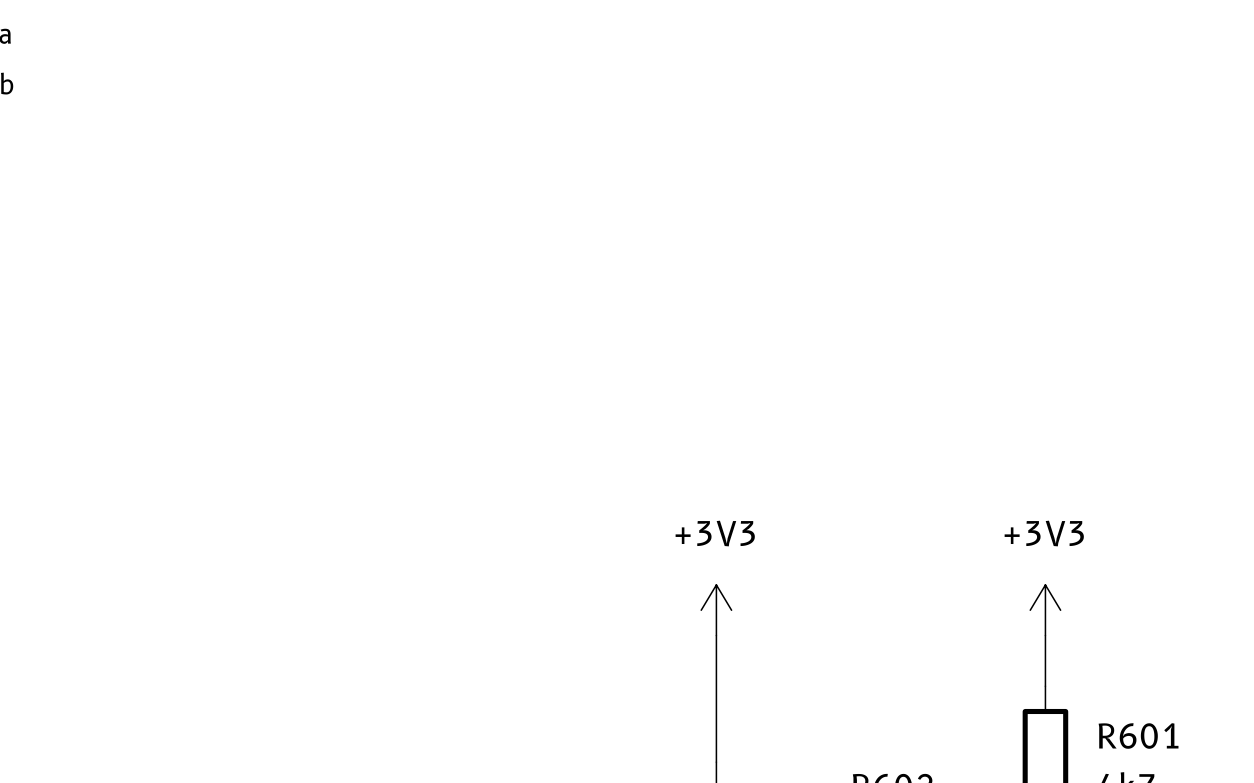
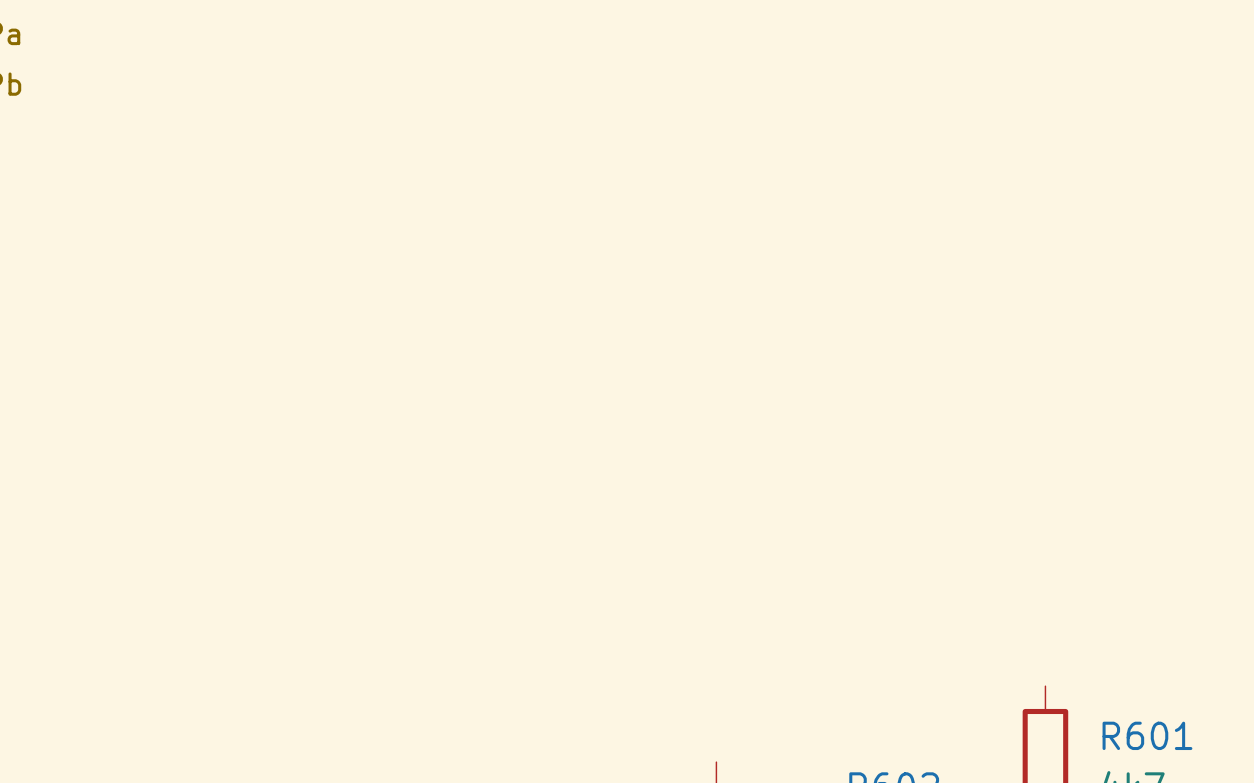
power symbol: +3V3 (716, 610) -> none
power symbol: +3V3 (1045, 610) -> none
wire: (716, 635) (716, 762) -> none
wire: (1045, 635) (1045, 686) -> none

